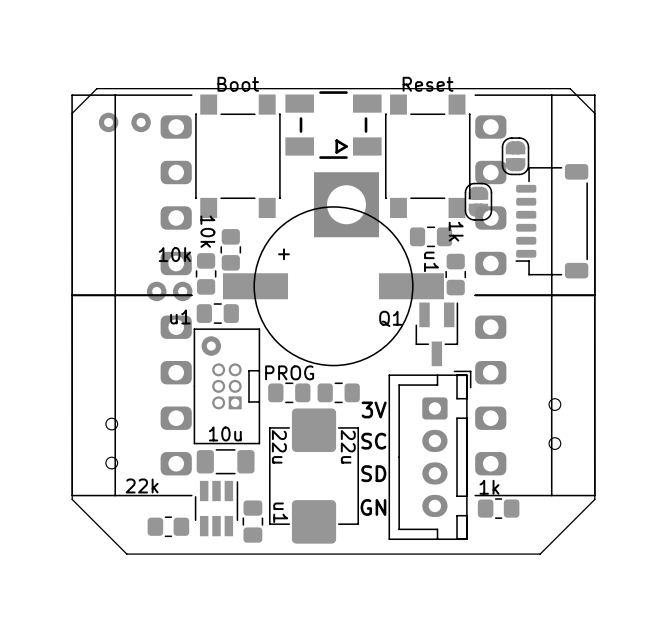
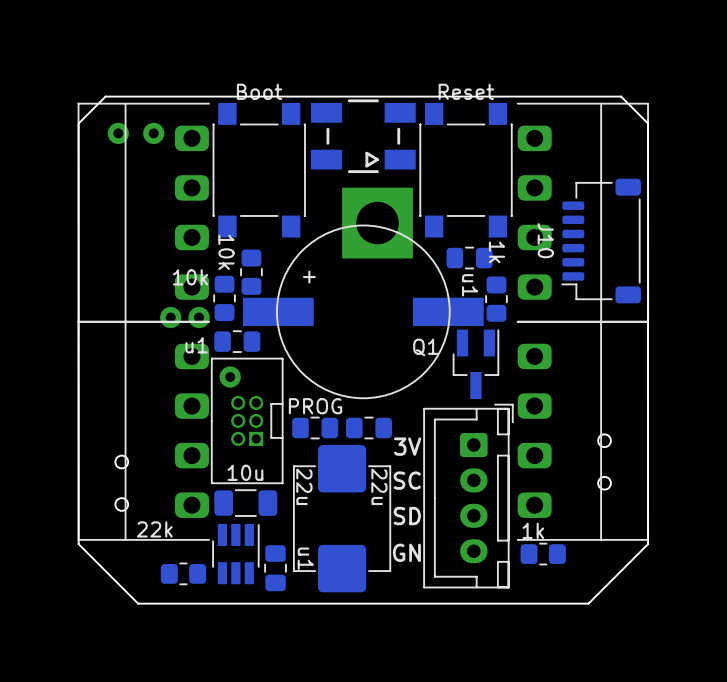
part: (515, 156) -> none
part: (478, 201) -> none
J10 name: none -> J10 (545, 240)

